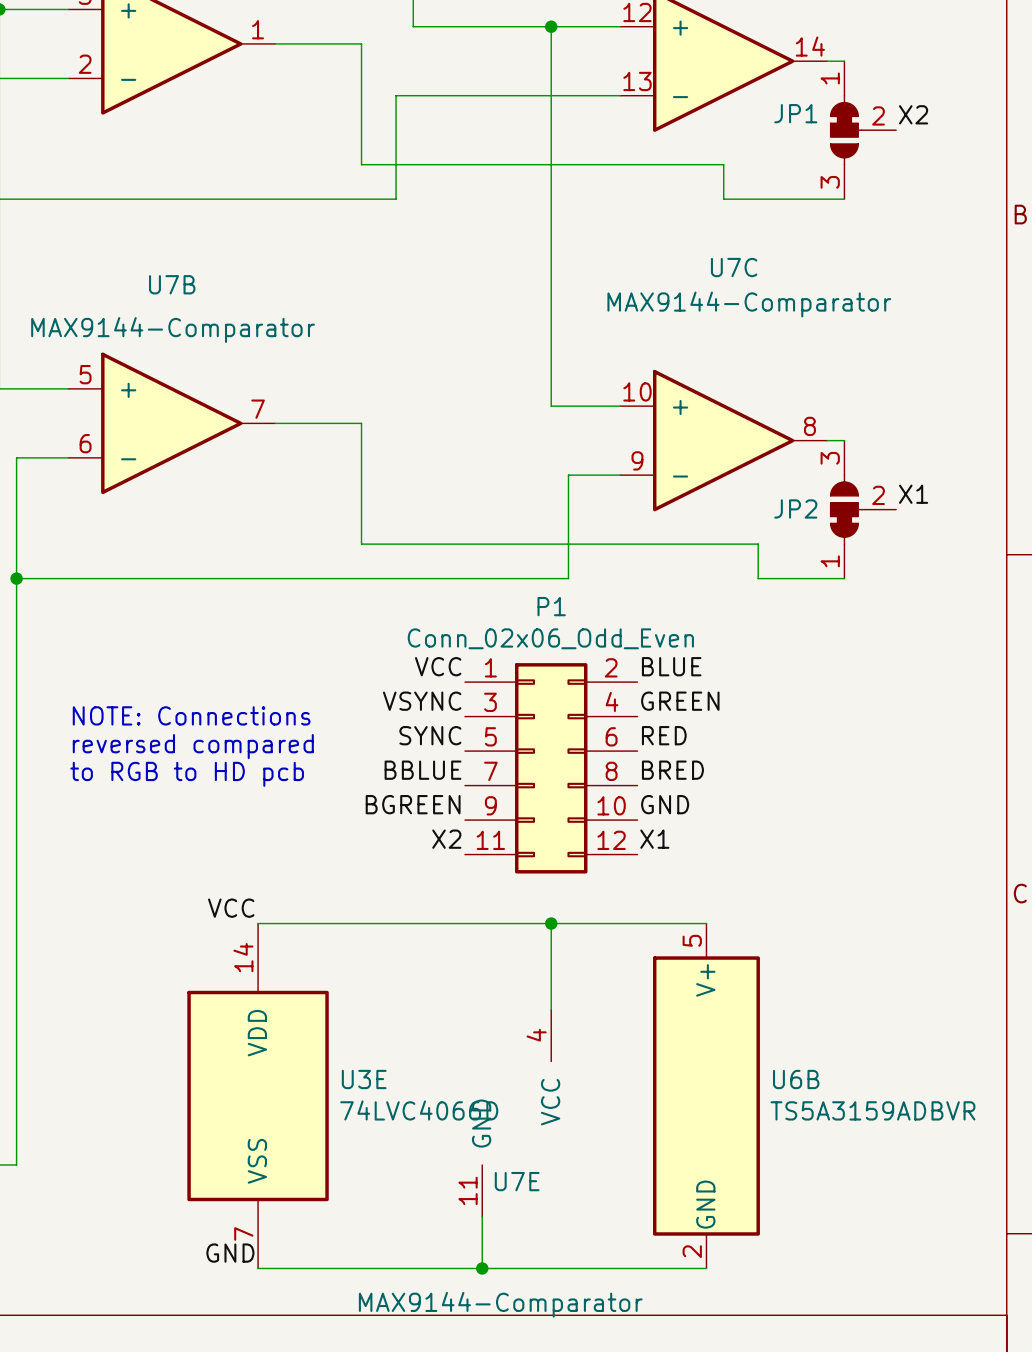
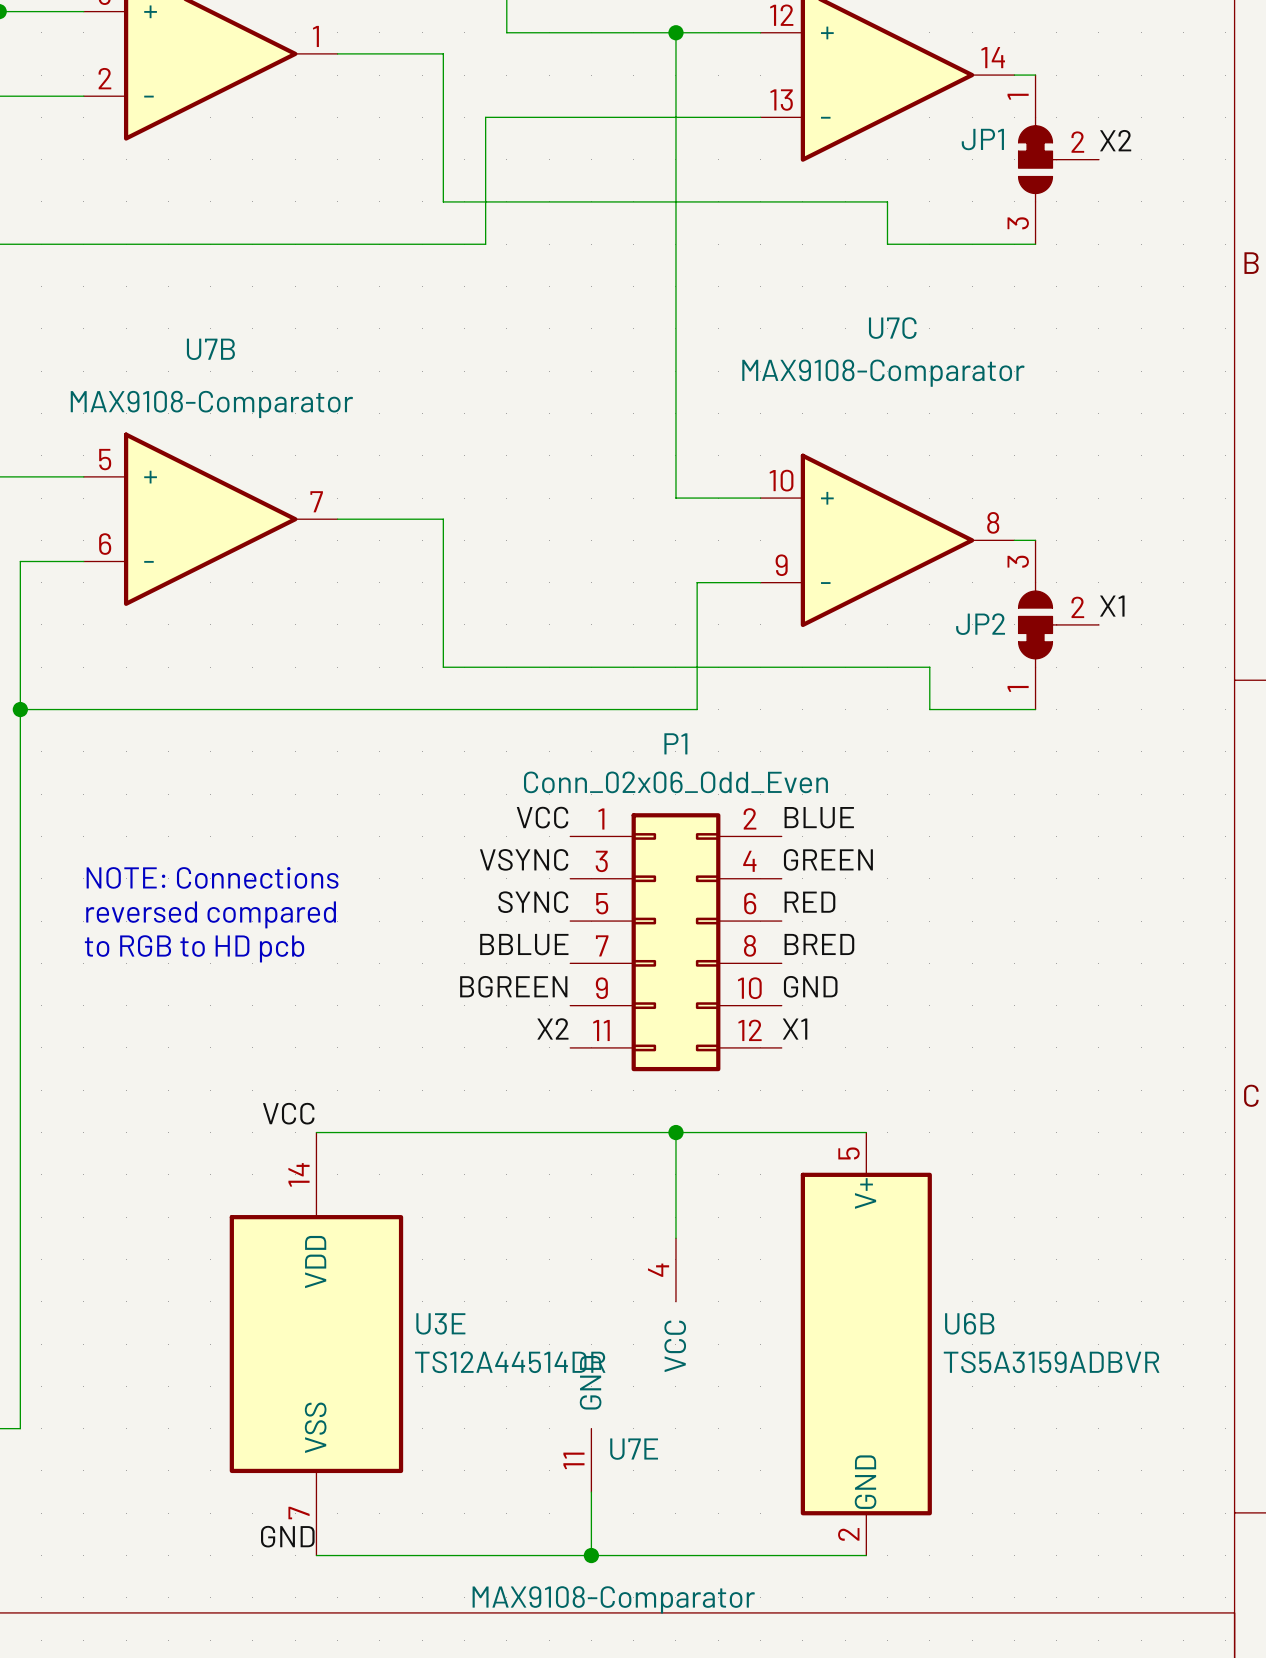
U7C value: MAX9144-Comparator (749, 304) -> MAX9108-Comparator (883, 373)
U7B value: MAX9144-Comparator (173, 330) -> MAX9108-Comparator (211, 404)
U3E value: 74LVC4066D (419, 1110) -> TS12A44514DR (510, 1362)
U7E value: MAX9144-Comparator (500, 1304) -> MAX9108-Comparator (613, 1599)

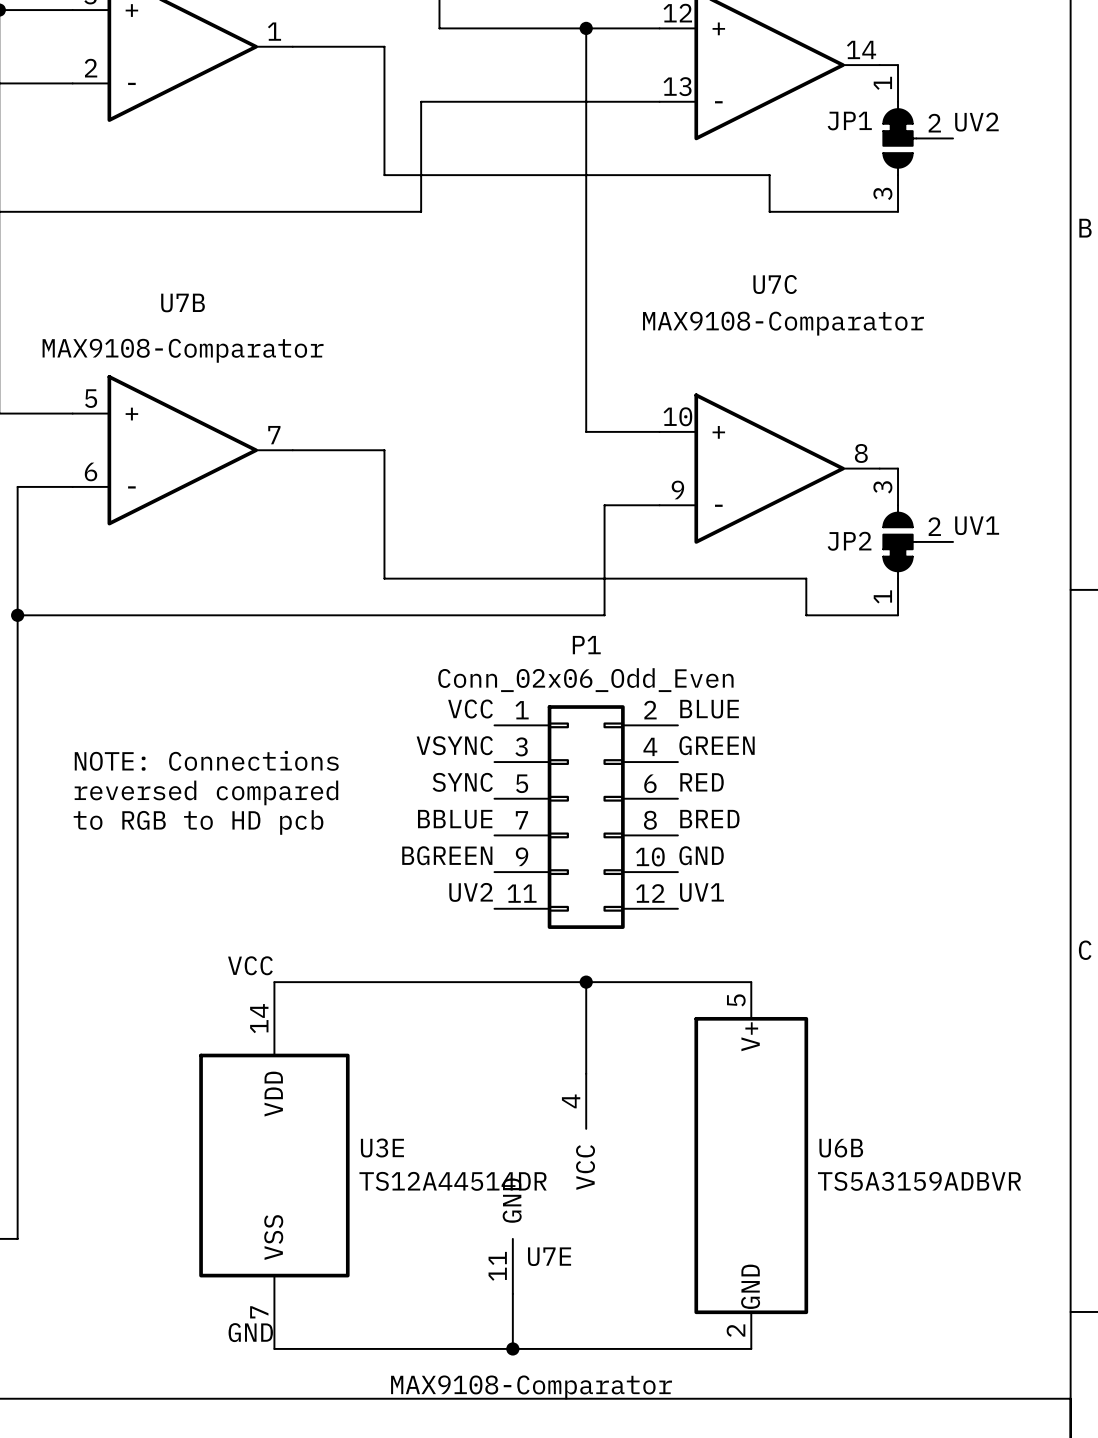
label: X2 (1115, 140) -> UV2 (976, 122)
label: X1 (1112, 606) -> UV1 (977, 525)
label: X2 (552, 1028) -> UV2 (471, 892)
label: X1 (795, 1029) -> UV1 (702, 892)

